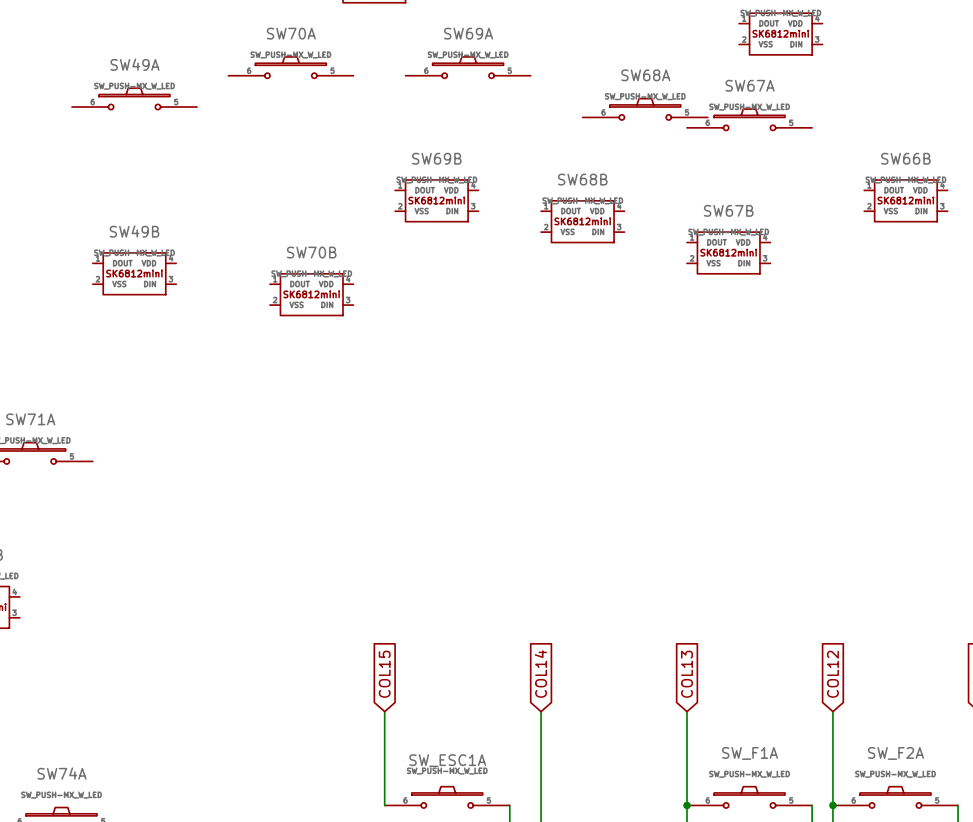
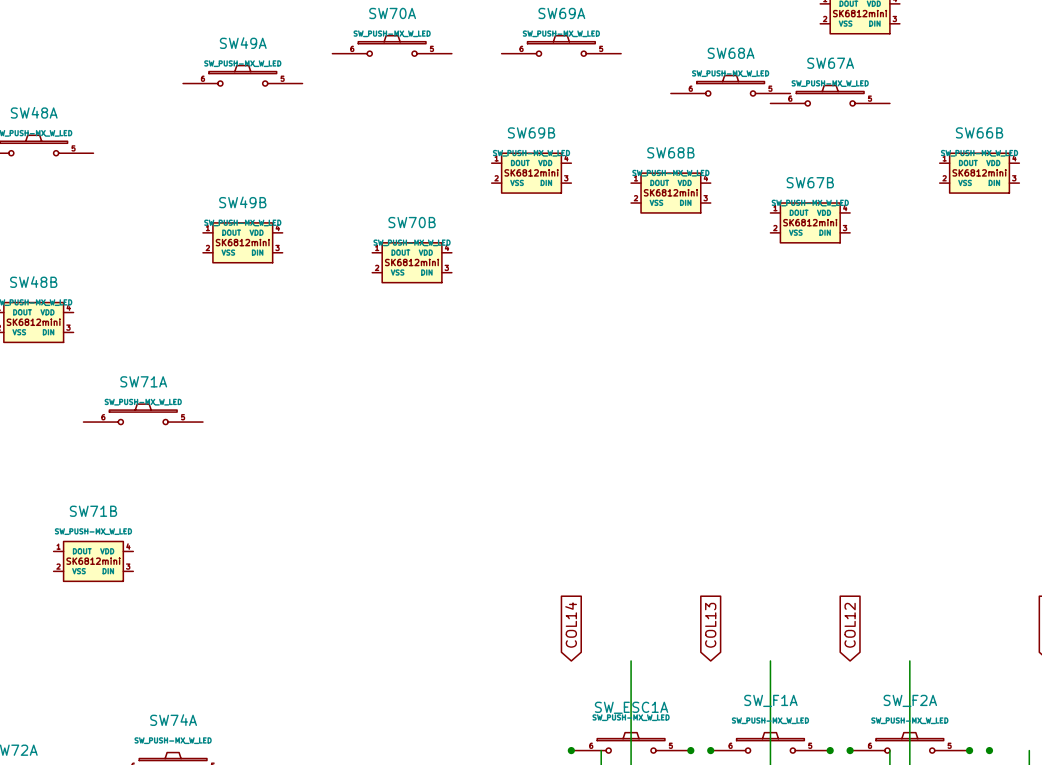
global label: COL15 (384, 674) -> none
global label position: COL14 (540, 674) -> COL14 (571, 625)
global label position: COL13 (687, 674) -> COL13 (710, 625)
global label position: COL12 (832, 674) -> COL12 (850, 625)
wire: (384, 711) (384, 805) -> none
SW_ESC1A position: (447, 797) -> (631, 742)
SW_F1A position: (749, 797) -> (770, 742)
SW_F2A position: (895, 797) -> (909, 742)
junction: none -> (571, 750)
junction: none -> (690, 750)
junction: none -> (710, 750)
junction: (687, 805) -> none
junction: none -> (830, 750)
junction: none -> (850, 750)
junction: (832, 805) -> none
junction: none -> (969, 750)
junction: none -> (989, 750)

